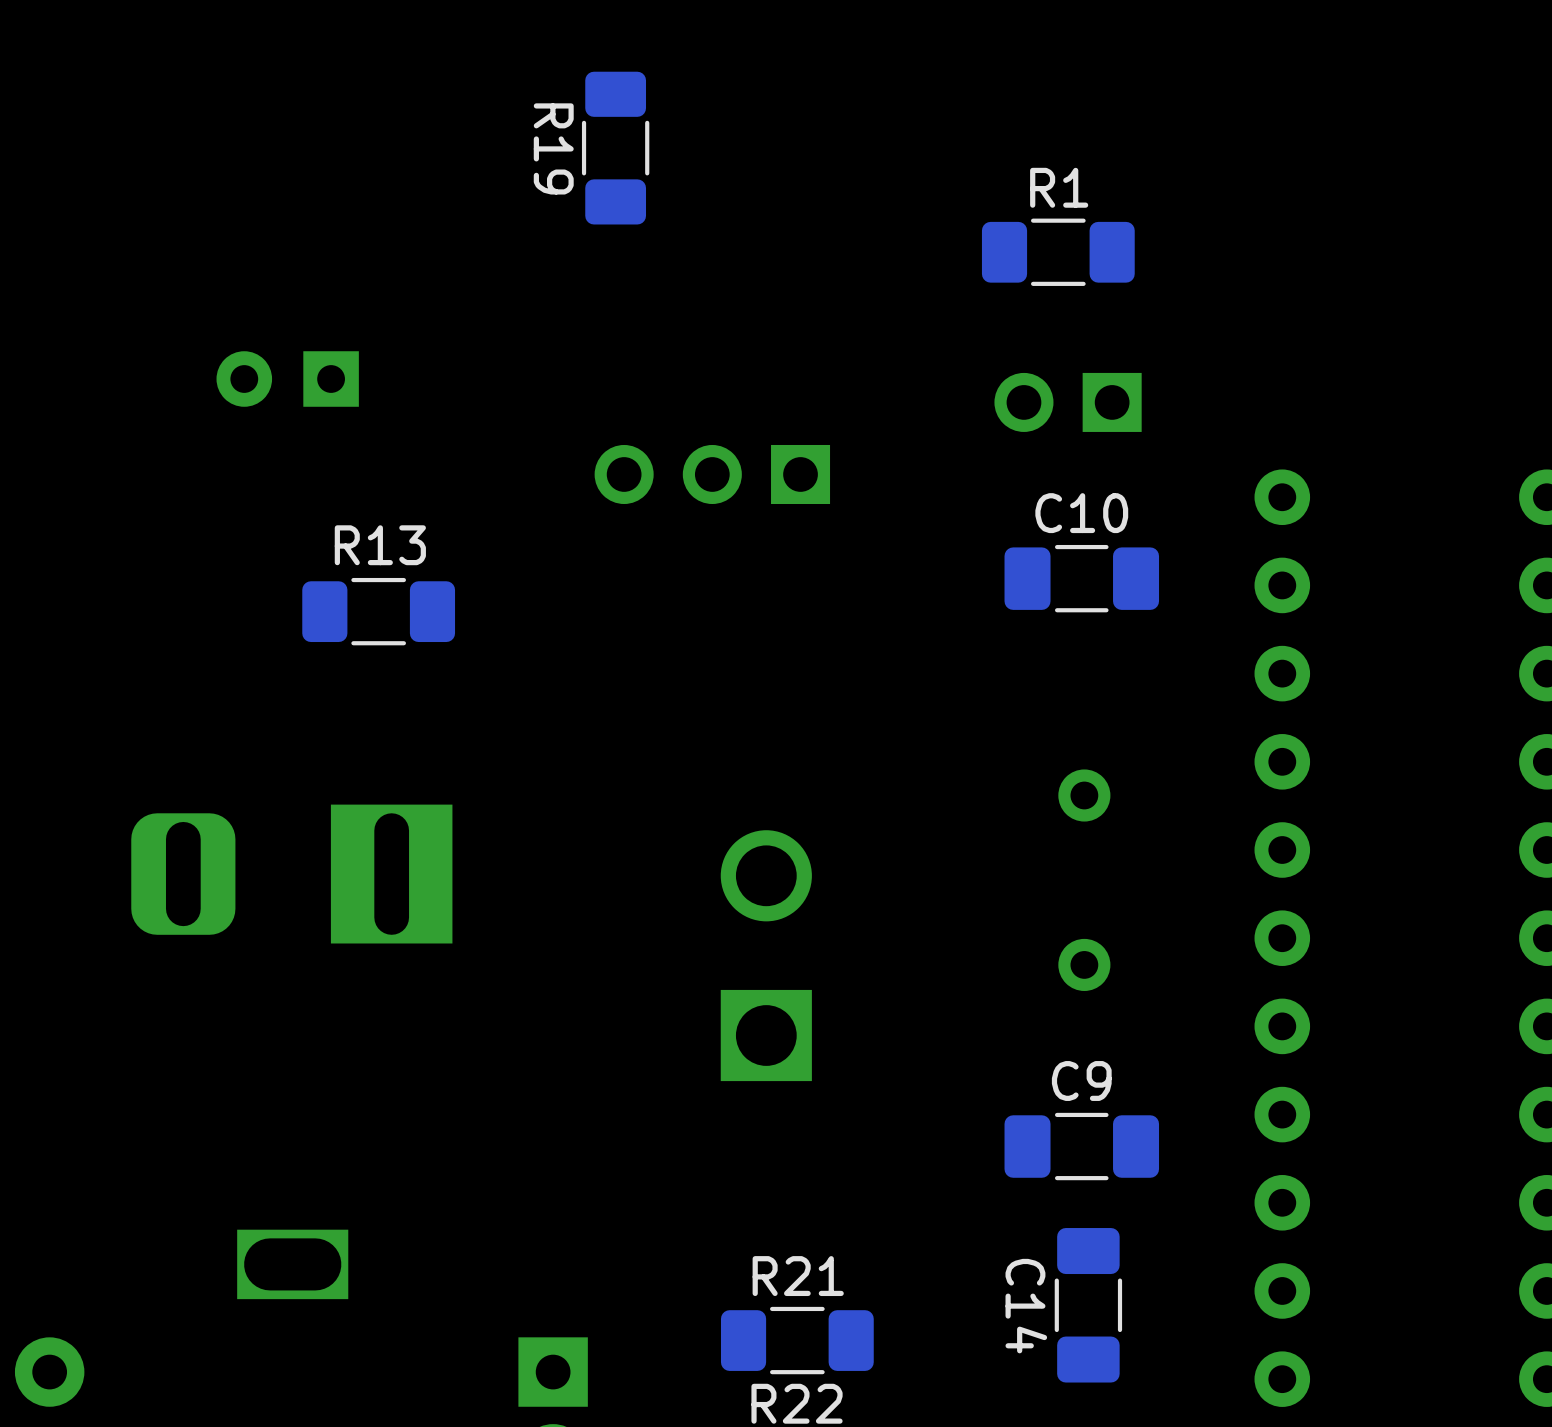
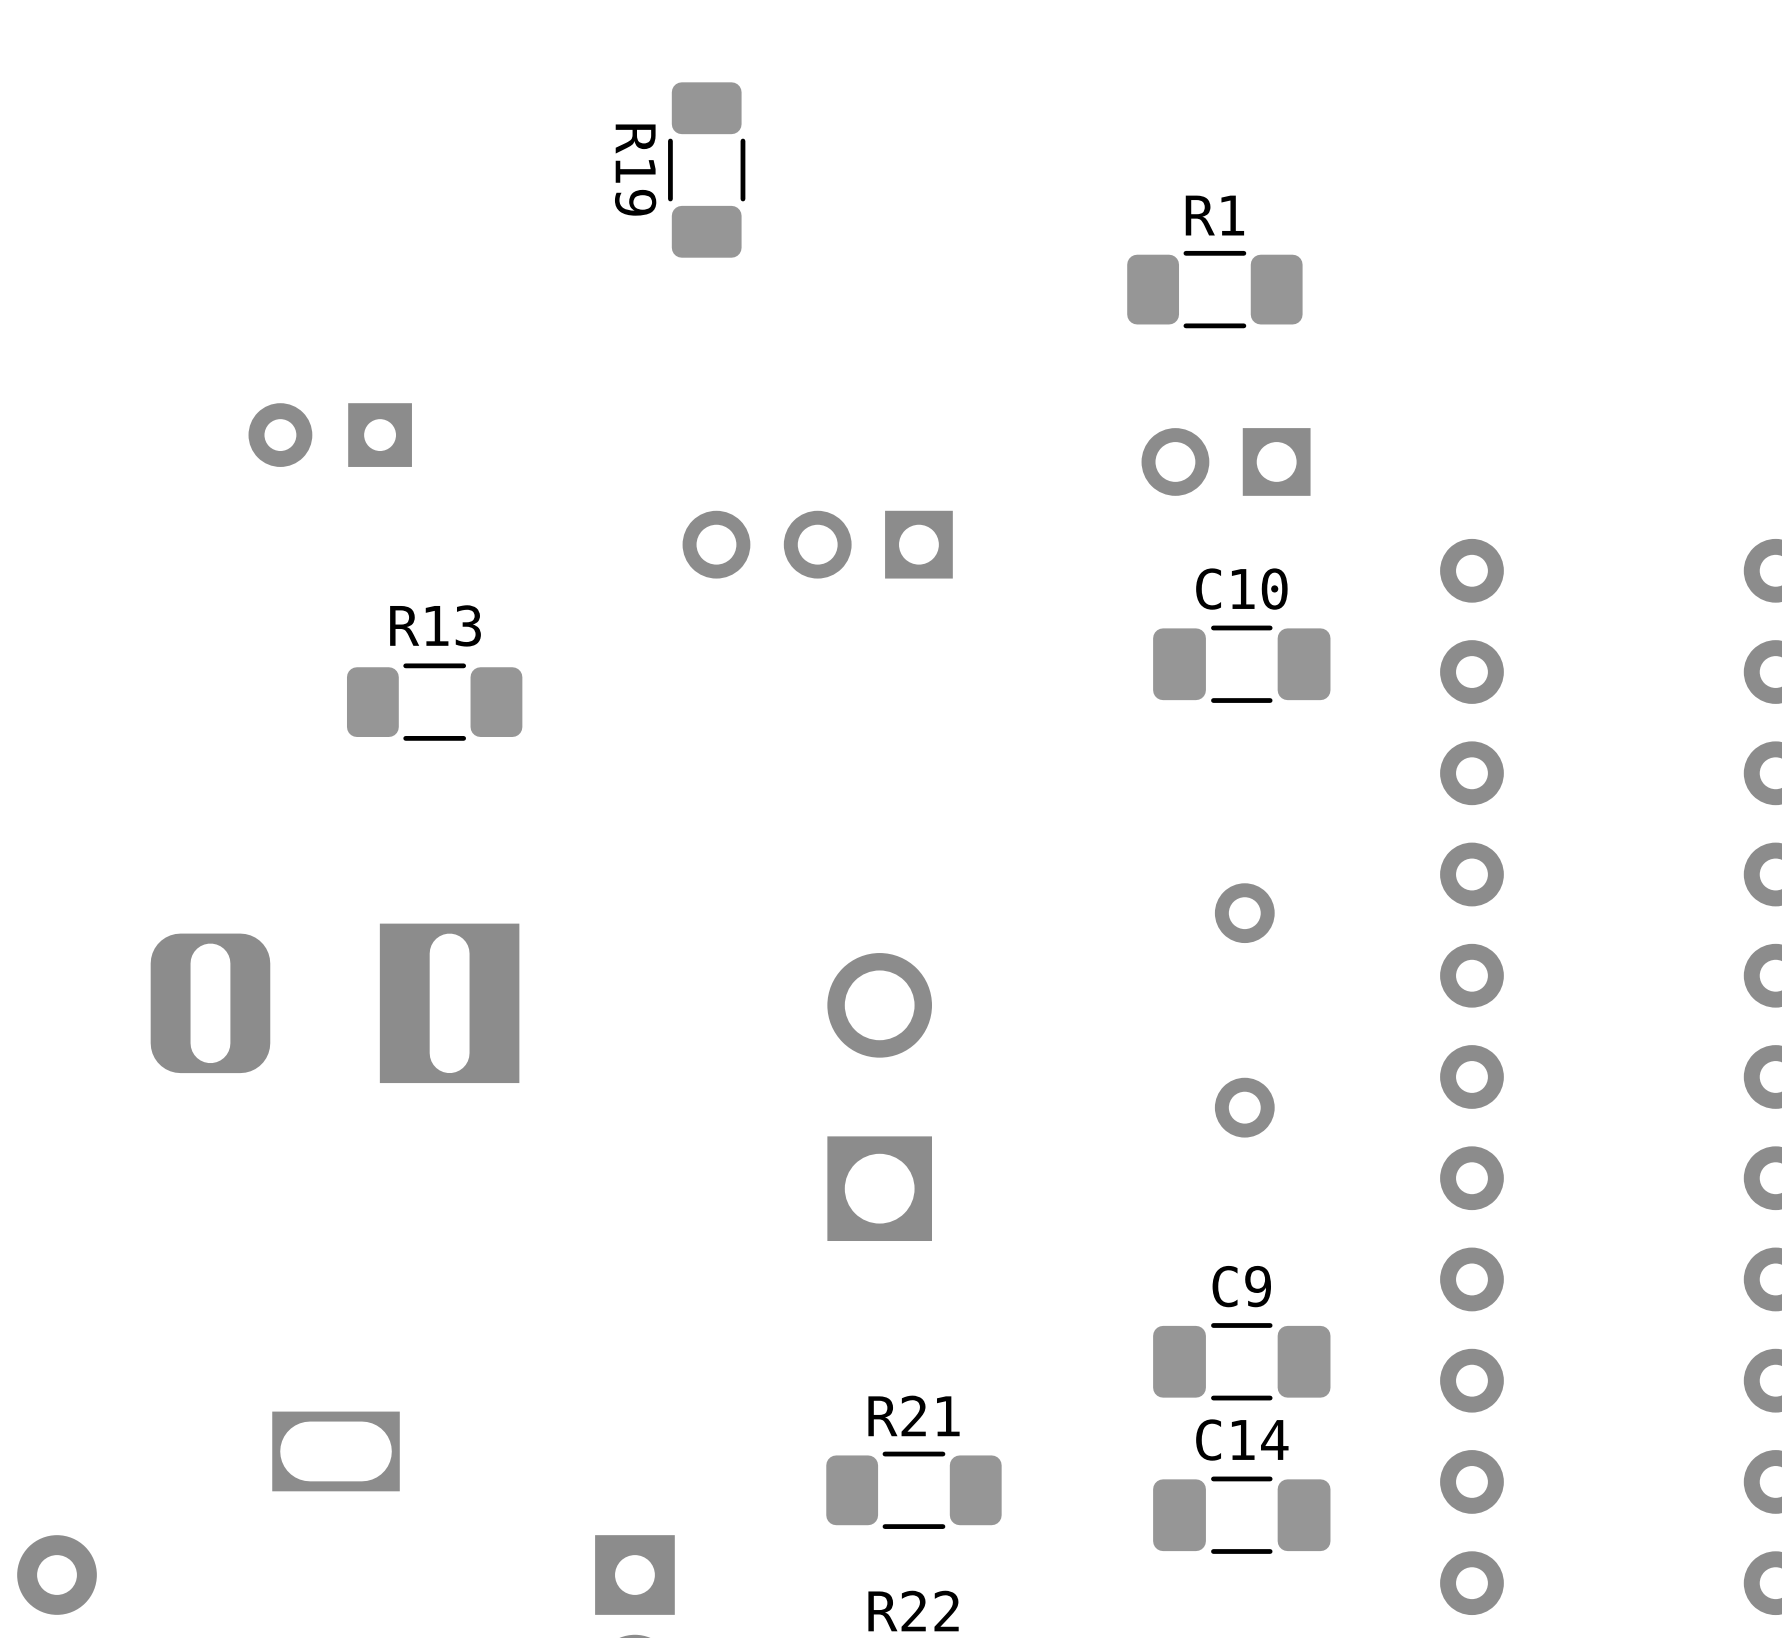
C9 position: (1081, 1146) -> (1241, 1361)
C14 rotation: 0° (1088, 1305) -> 90° clockwise (1241, 1515)
R21 position: (797, 1340) -> (913, 1490)

